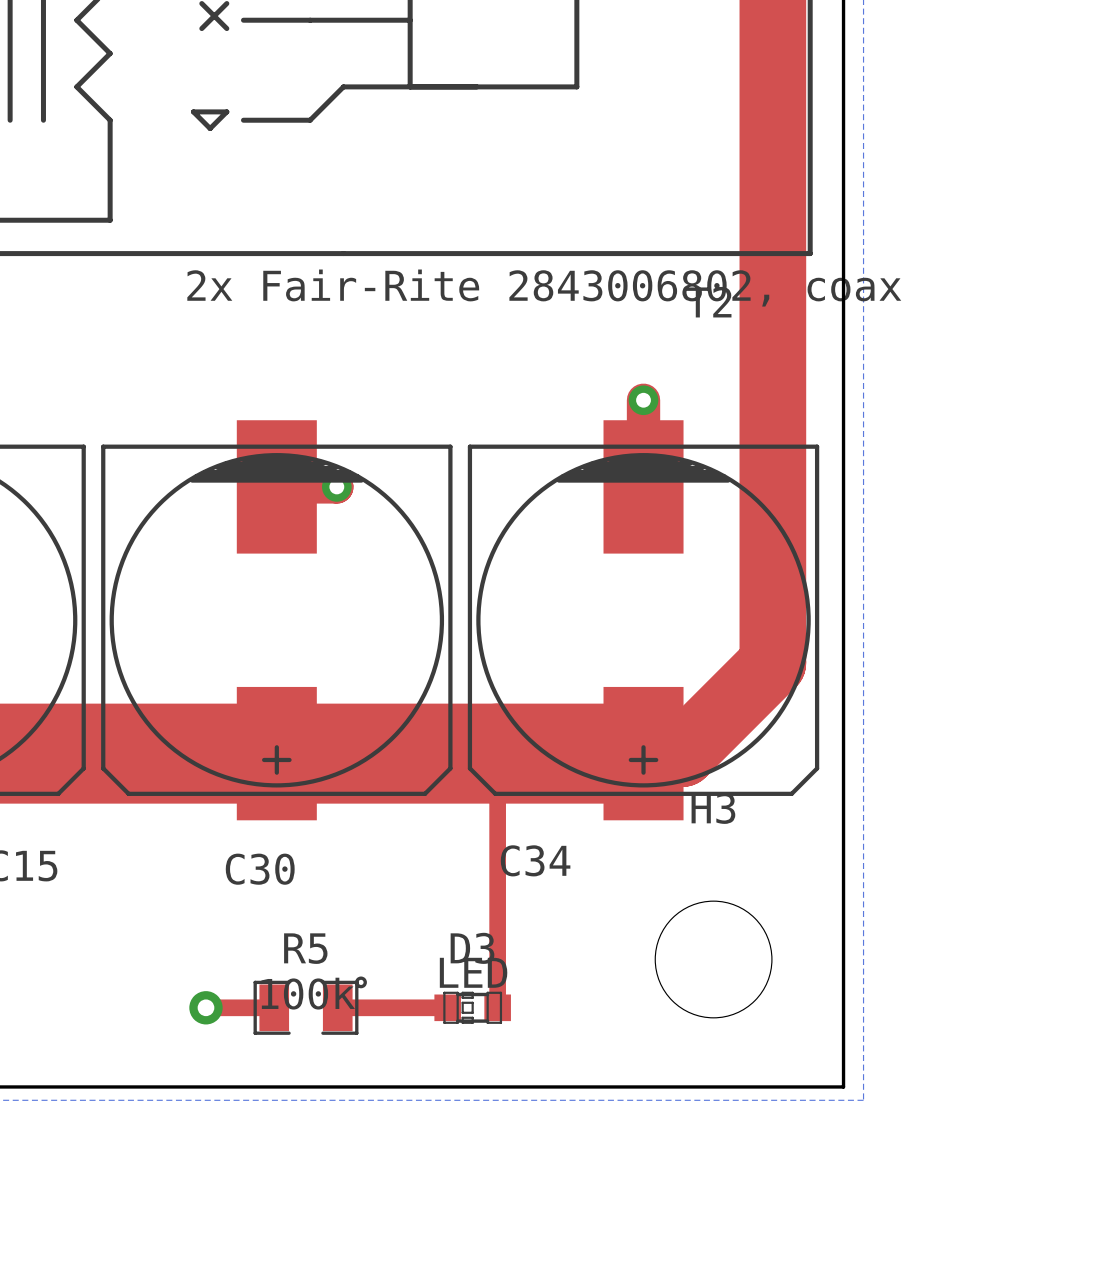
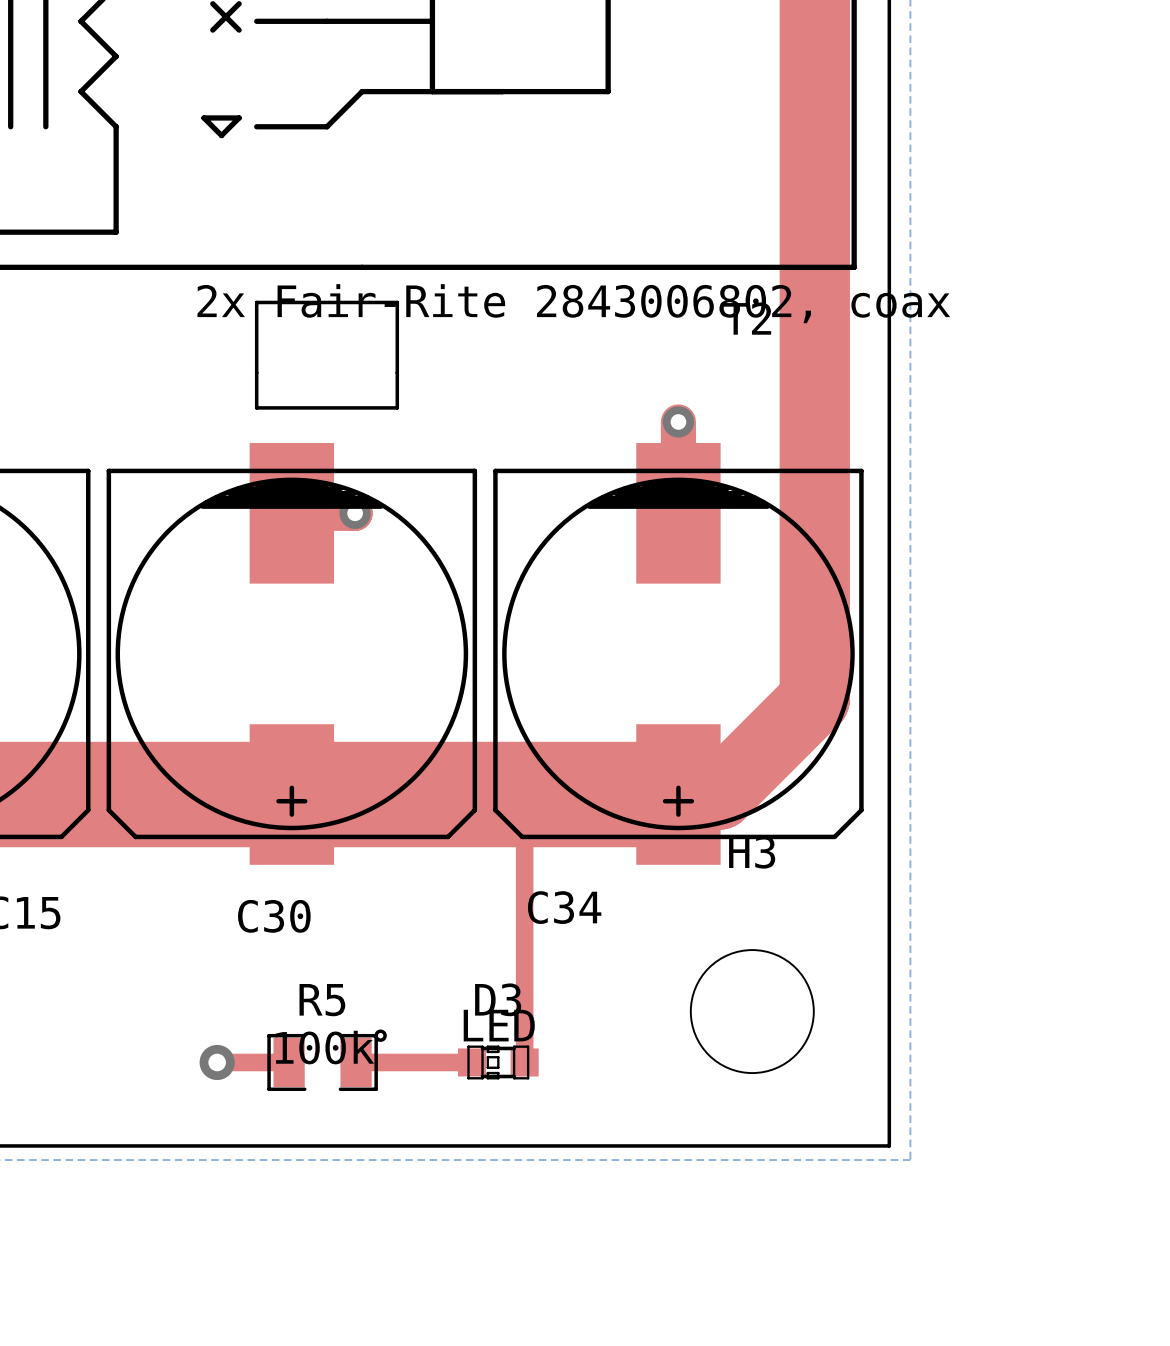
board edge: none -> (256, 302) (256, 407) (397, 407) (397, 302) (256, 302)

